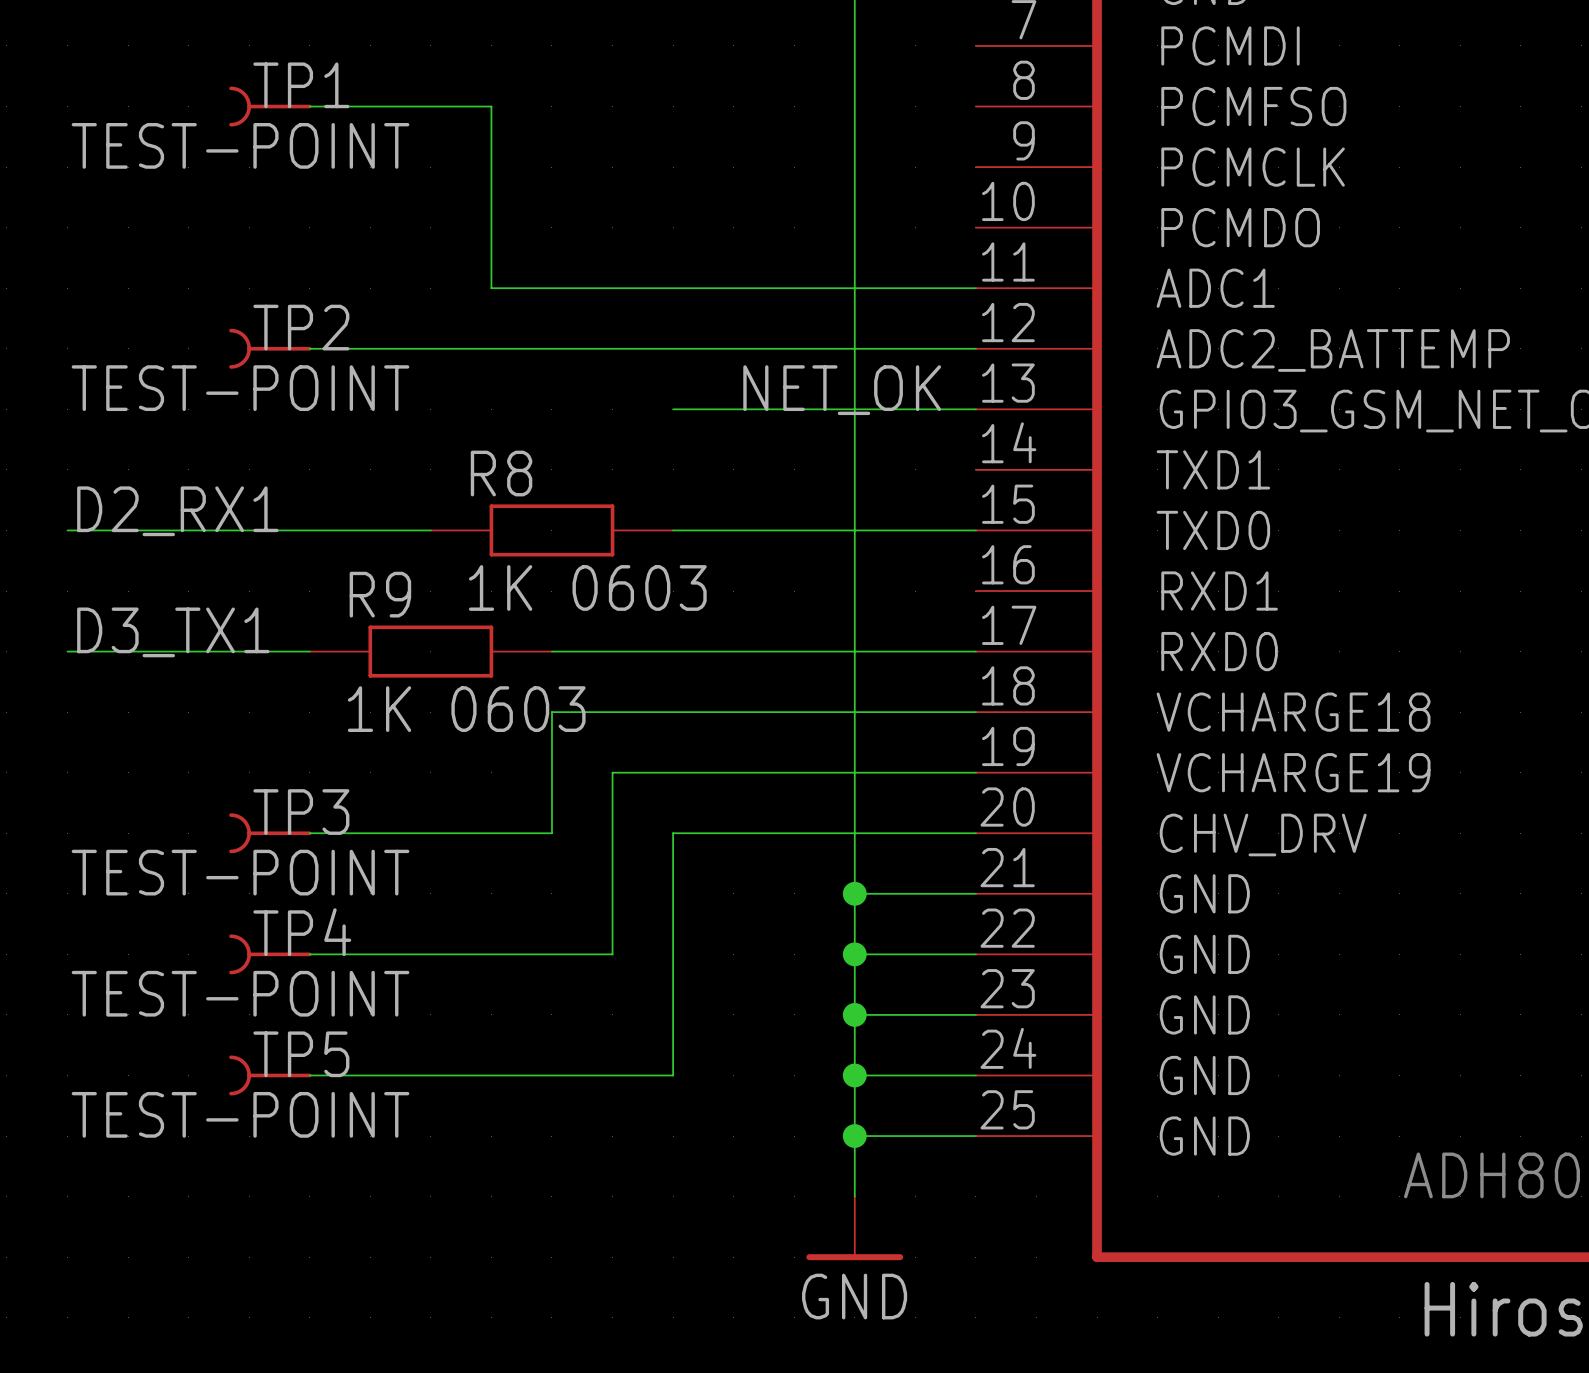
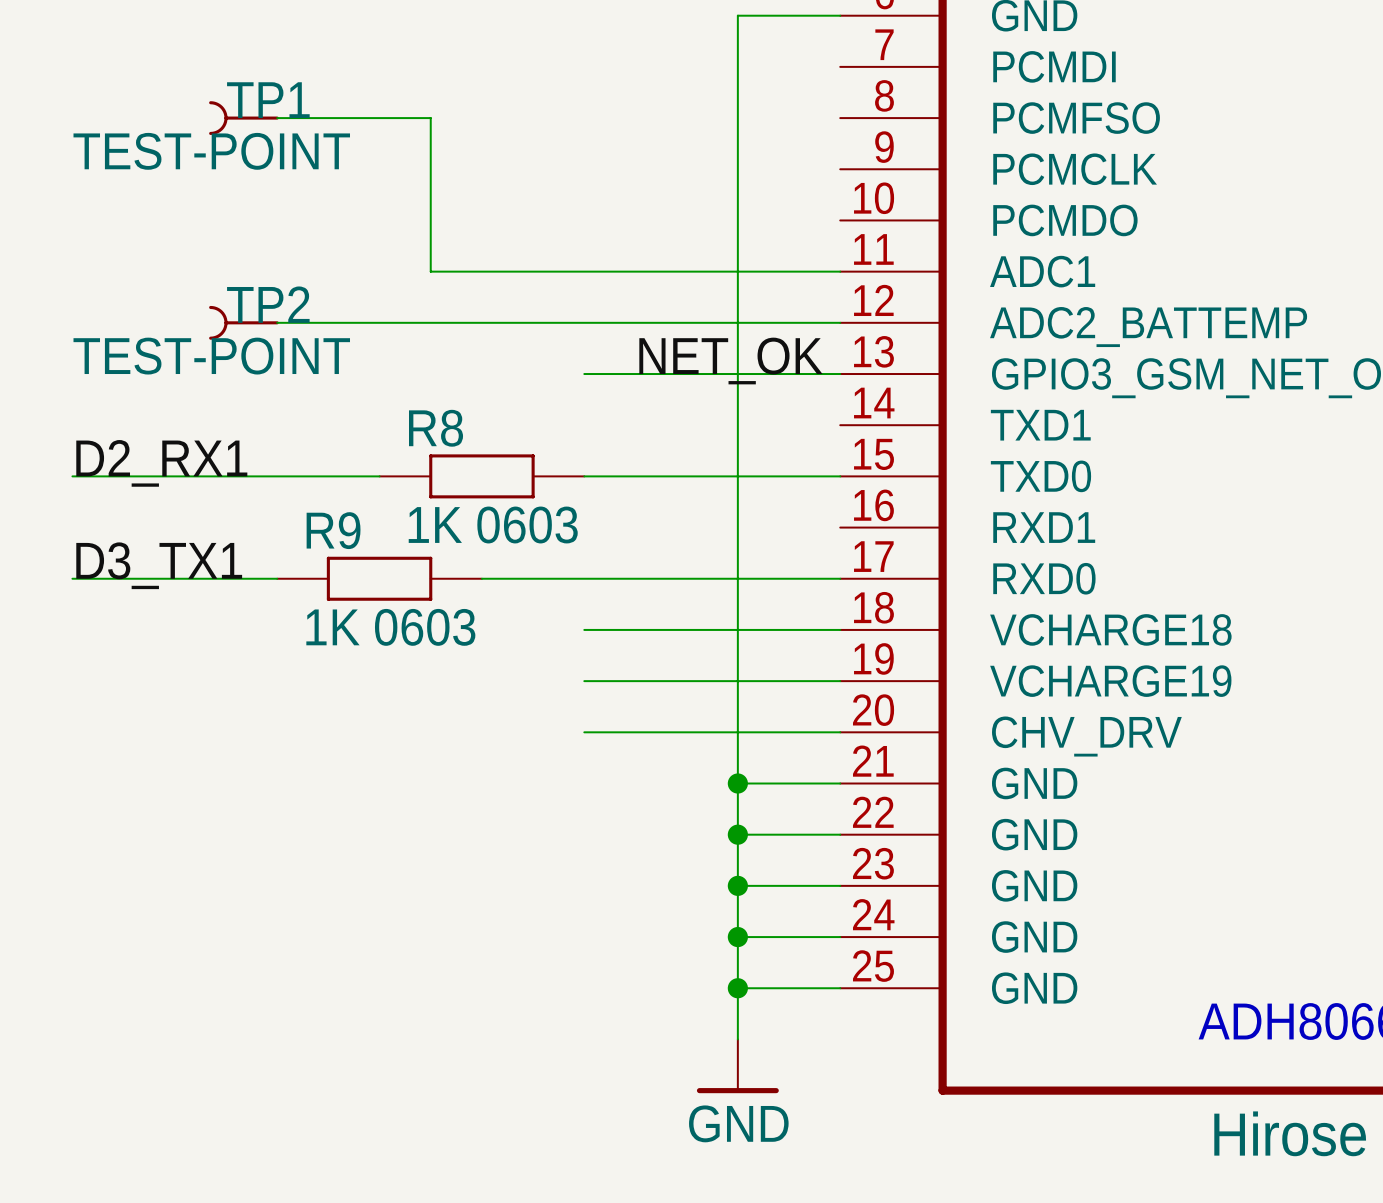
wire: (673, 712) (551, 712) (551, 833) (309, 833) -> none
wire: (673, 772) (612, 772) (612, 954) (309, 954) -> none
TP3: TEST-POINT (270, 833) -> none
wire: (673, 833) (673, 1075) (309, 1075) -> none
TP4: TEST-POINT (270, 954) -> none
TP5: TEST-POINT (270, 1075) -> none

